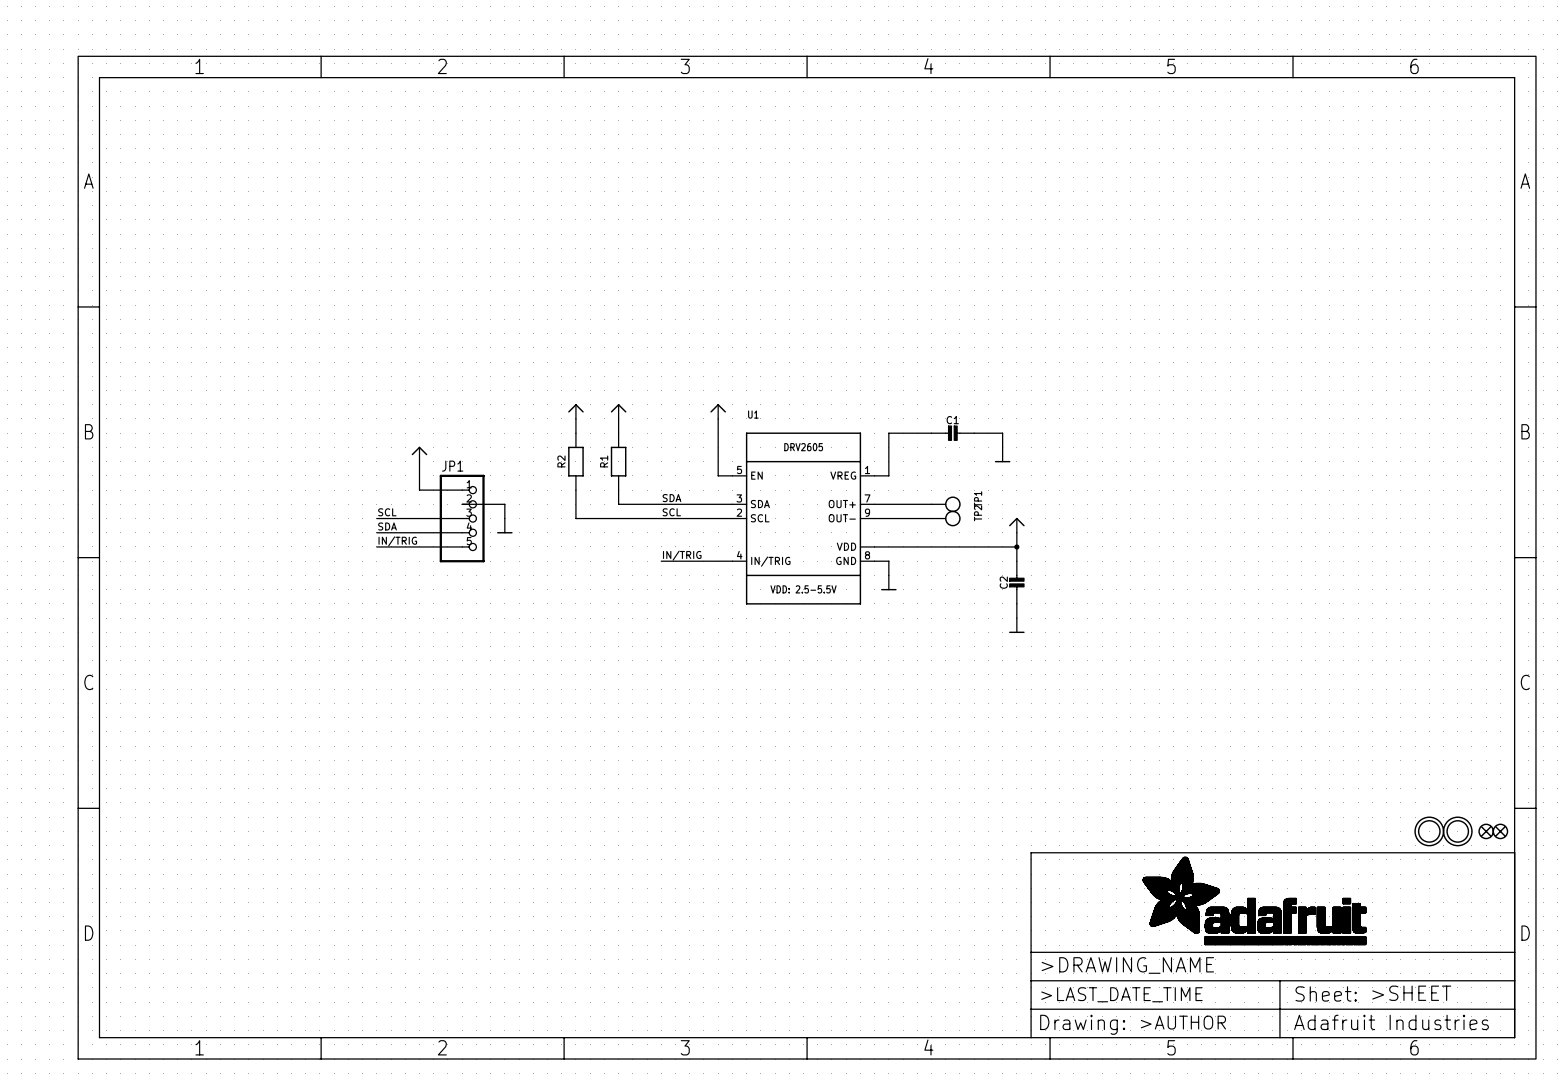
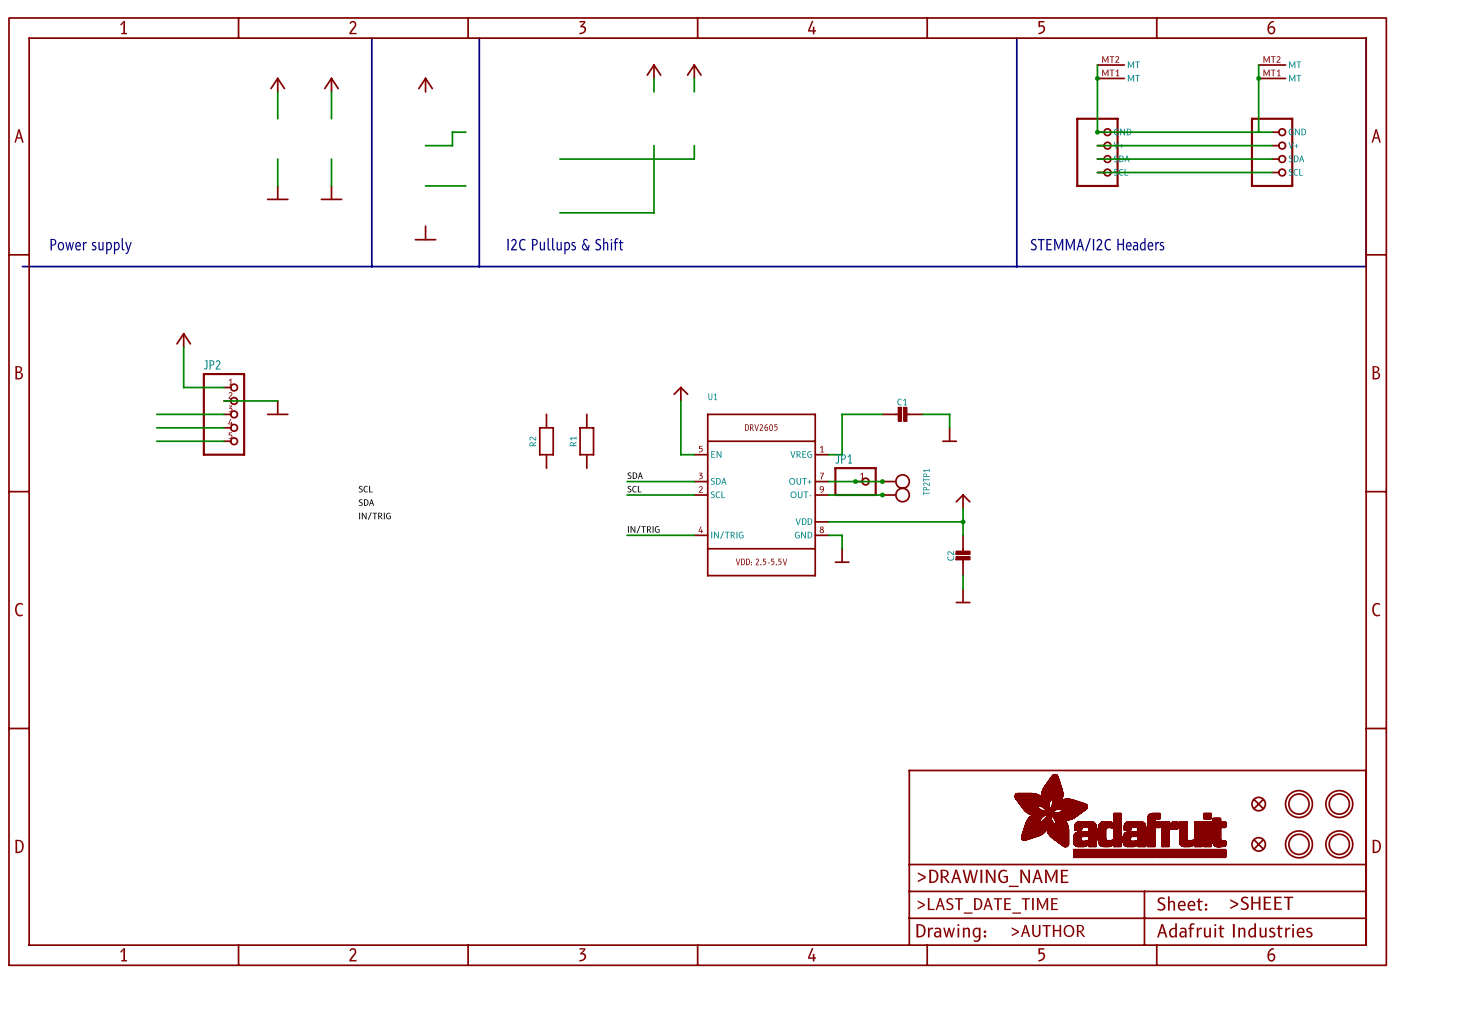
line: none -> (371, 38) (371, 266)
line: none -> (479, 38) (479, 266)
line: none -> (1016, 38) (1016, 266)
line: none -> (1366, 38) (1366, 266) (22, 266)
wire: none -> (1097, 65) (1097, 132) (1272, 132)
part: none -> (1110, 65)
wire: none -> (1258, 65) (1258, 132)
part: none -> (1272, 65)
power symbol: none -> (653, 71)
power symbol: none -> (694, 71)
wire: none -> (653, 78) (653, 91)
wire: none -> (694, 78) (694, 91)
junction: none -> (1097, 78)
part: none -> (1110, 78)
junction: none -> (1258, 78)
part: none -> (1272, 78)
power symbol: none -> (277, 84)
power symbol: none -> (331, 84)
power symbol: none -> (425, 84)
wire: none -> (277, 91) (277, 118)
wire: none -> (331, 91) (331, 118)
wire: none -> (465, 132) (452, 132) (452, 145) (425, 145)
junction: none -> (1097, 132)
wire: none -> (653, 145) (653, 212) (559, 212)
wire: none -> (694, 145) (694, 159) (559, 159)
wire: none -> (1097, 145) (1272, 145)
part: none -> (1097, 152)
part: none -> (1272, 152)
wire: none -> (277, 159) (277, 185)
wire: none -> (331, 159) (331, 185)
wire: none -> (1097, 159) (1272, 159)
wire: none -> (1097, 172) (1272, 172)
wire: none -> (425, 185) (465, 185)
power symbol: none -> (277, 193)
power symbol: none -> (331, 193)
power symbol: none -> (425, 233)
text: none -> STEMMA/I2C Headers (1097, 244)
text: none -> Power supply (91, 246)
text: none -> I2C Pullups & Shift (565, 246)
power symbol: none -> (183, 340)
wire: none -> (183, 347) (183, 387) (223, 387)
power symbol: (575, 411) -> none
power symbol: (618, 411) -> none
wire: none -> (223, 400) (277, 400)
wire: (575, 418) (575, 433) -> none
wire: (618, 418) (618, 433) -> none
power symbol: none -> (277, 408)
wire: none -> (156, 414) (223, 414)
JP2: none -> (223, 414)
wire: none -> (156, 427) (223, 427)
power symbol: (419, 454) -> none
wire: none -> (156, 441) (223, 441)
wire: (419, 461) (419, 490) (462, 490) -> none
JP1 name position: JP1 (452, 466) -> JP1 (843, 458)
JP1 symbol: [439, 474, 485, 563] -> [834, 467, 877, 497]
wire: (575, 490) (575, 518) (661, 518) -> none
wire: (618, 490) (618, 504) (661, 504) -> none
wire: (462, 504) (504, 504) (504, 518) -> none
junction: none -> (855, 481)
junction: none -> (882, 481)
wire: (376, 518) (462, 518) -> none
junction: none -> (882, 495)
power symbol: (504, 526) -> none
wire: (376, 532) (462, 532) -> none
wire: (376, 546) (462, 546) -> none
drawing position: (807, 557) -> (697, 491)
part position: (1429, 831) -> (1339, 804)
part: (1457, 831) -> none
part: (1486, 831) -> none
part: (1500, 831) -> none
part: none -> (1258, 804)
part: none -> (1298, 804)
part: none -> (1258, 844)
part: none -> (1298, 844)
part: none -> (1339, 844)

